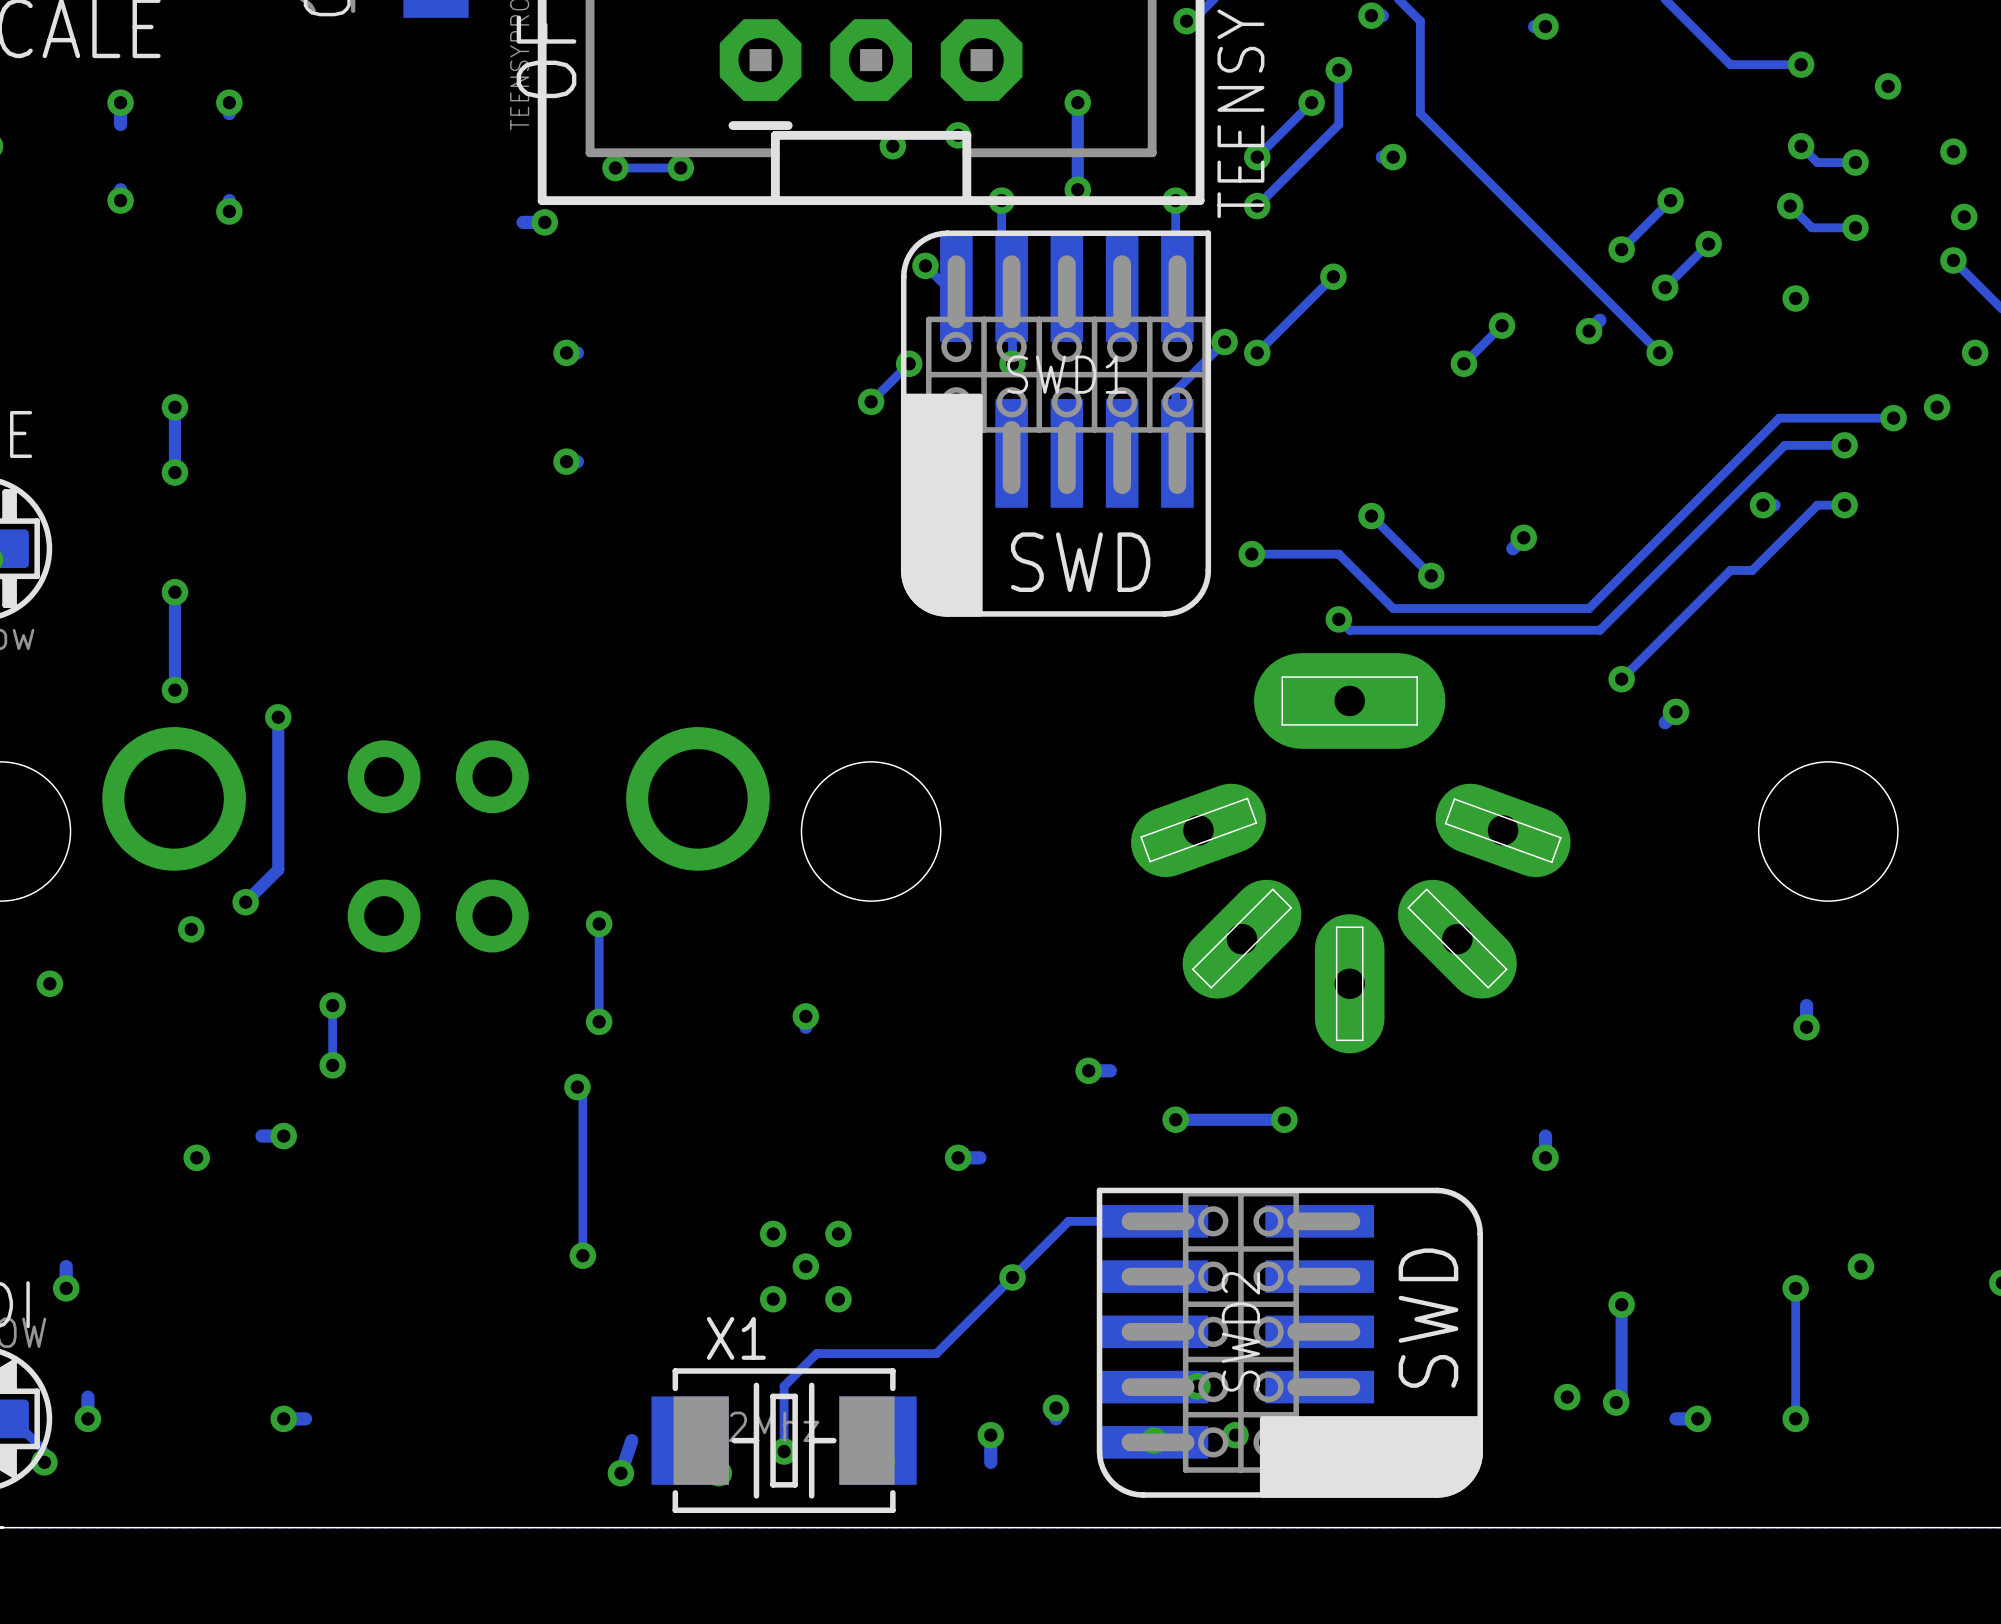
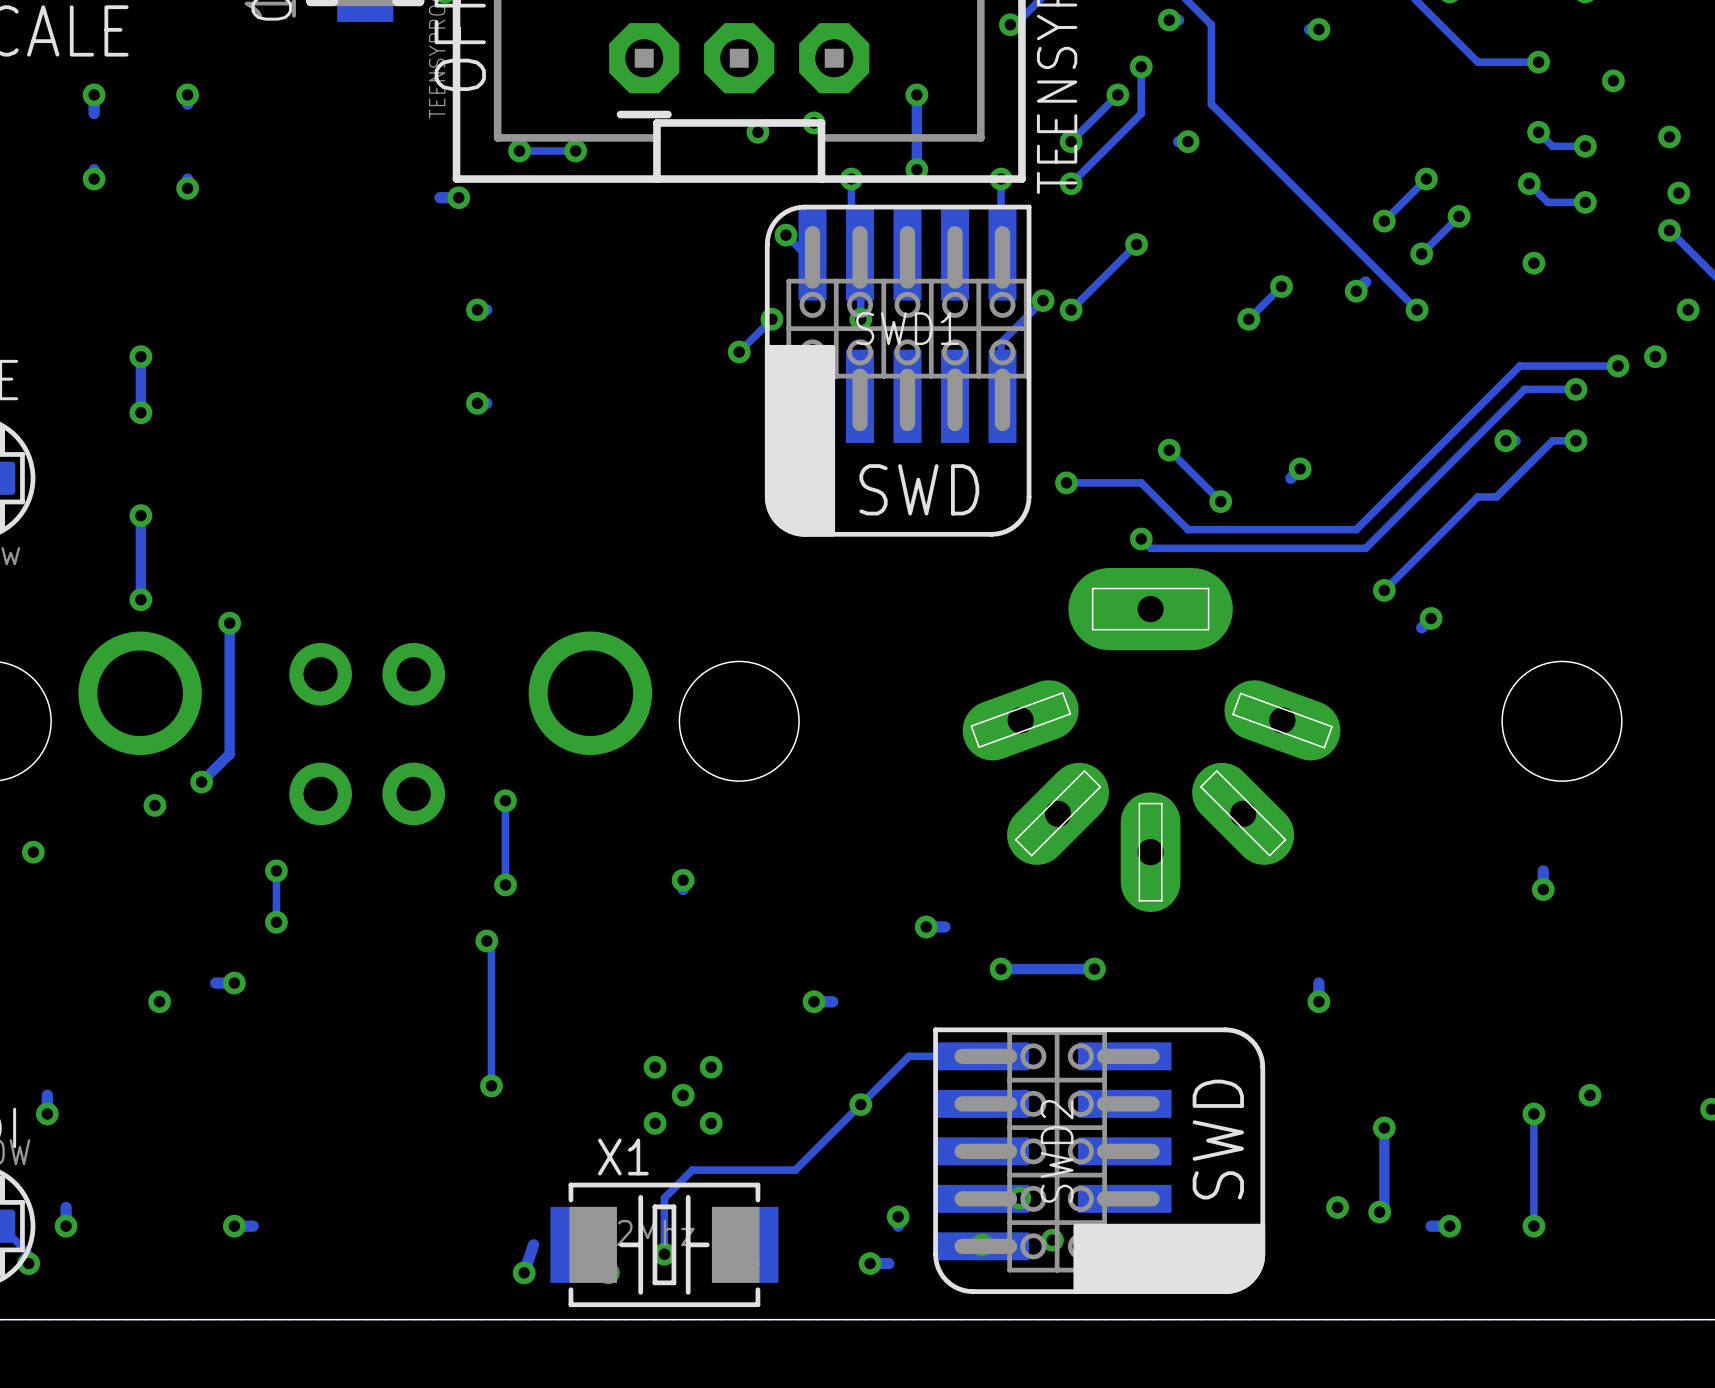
track: (990, 1435) (990, 1462) -> none
via position: (990, 1435) -> (870, 1263)
track: none -> (888, 1263) (870, 1263)

